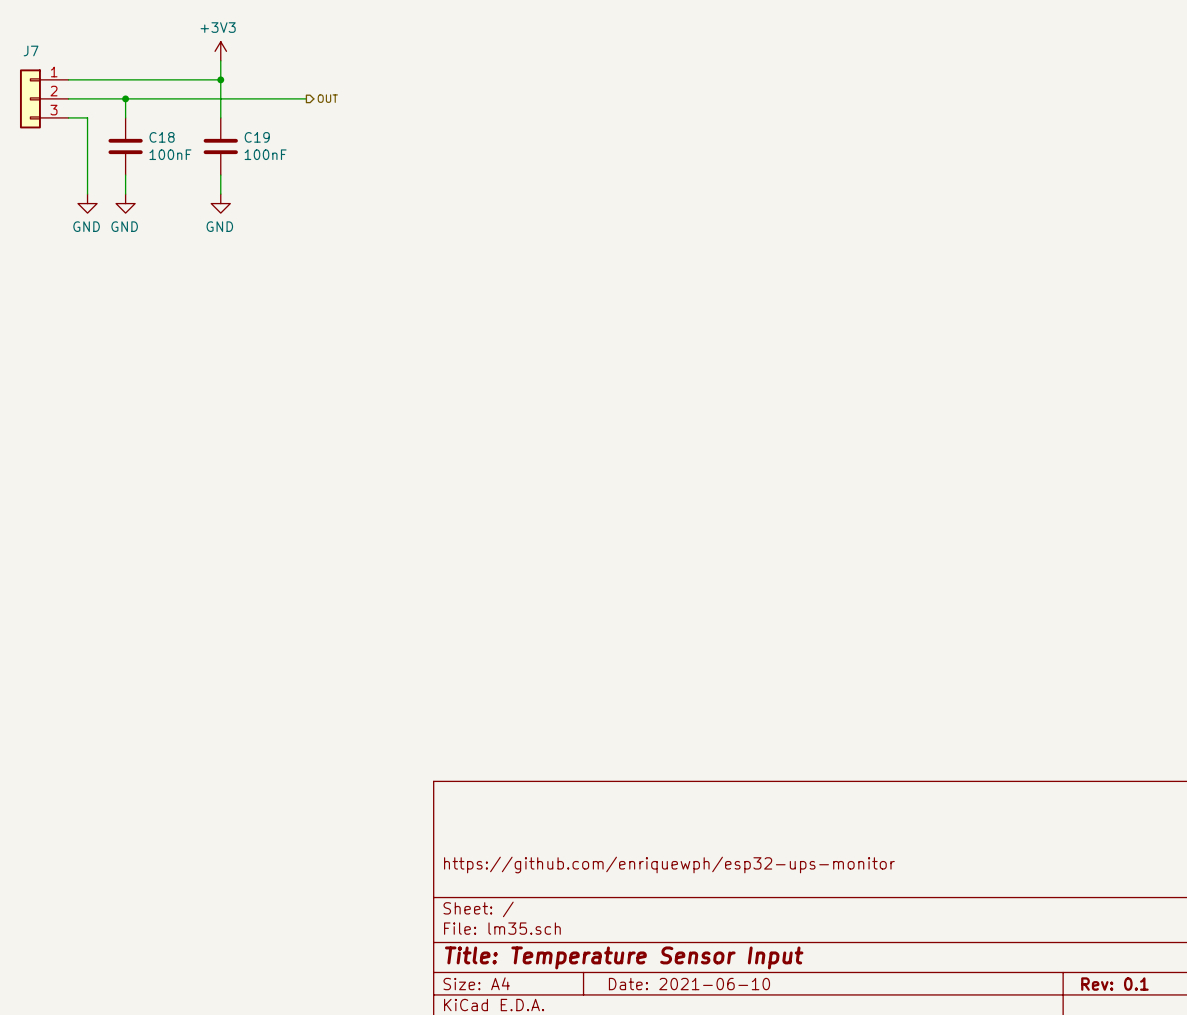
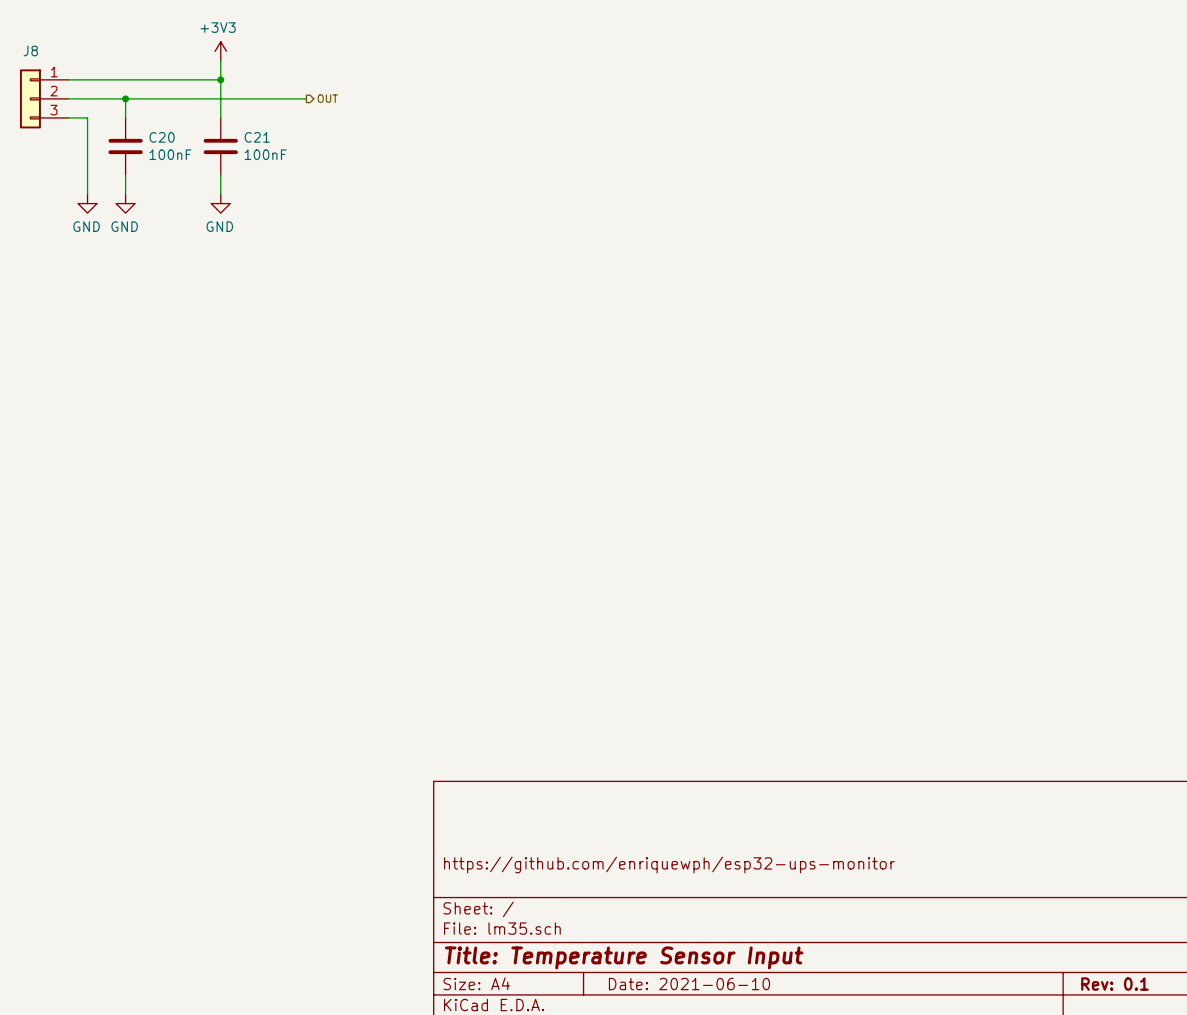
J7 name: J7 (31, 50) -> J8 (30, 50)
C18 name: C18 (162, 137) -> C20 (162, 137)
C19 name: C19 (257, 137) -> C21 (257, 137)

